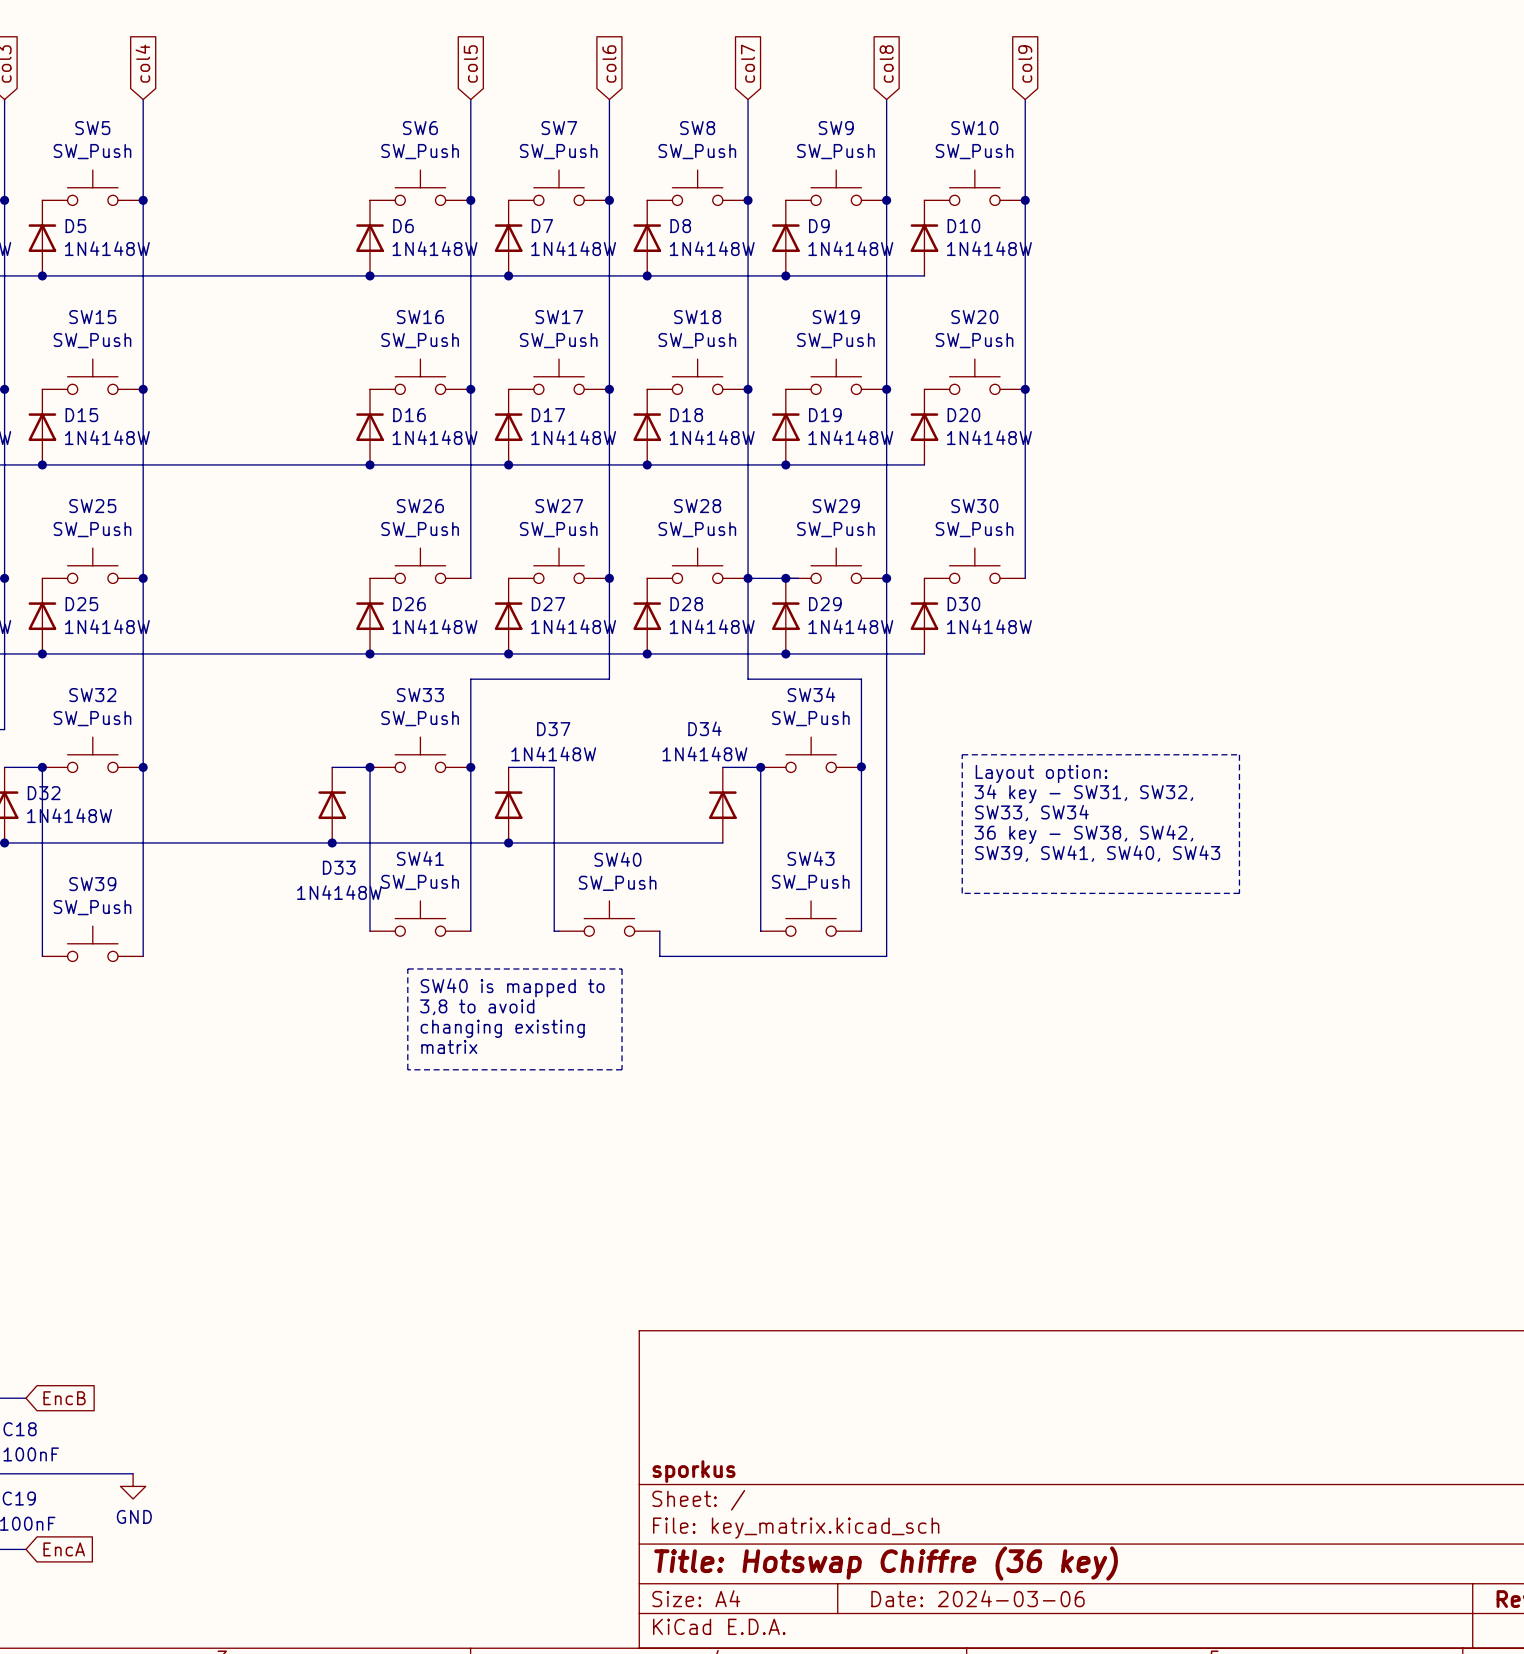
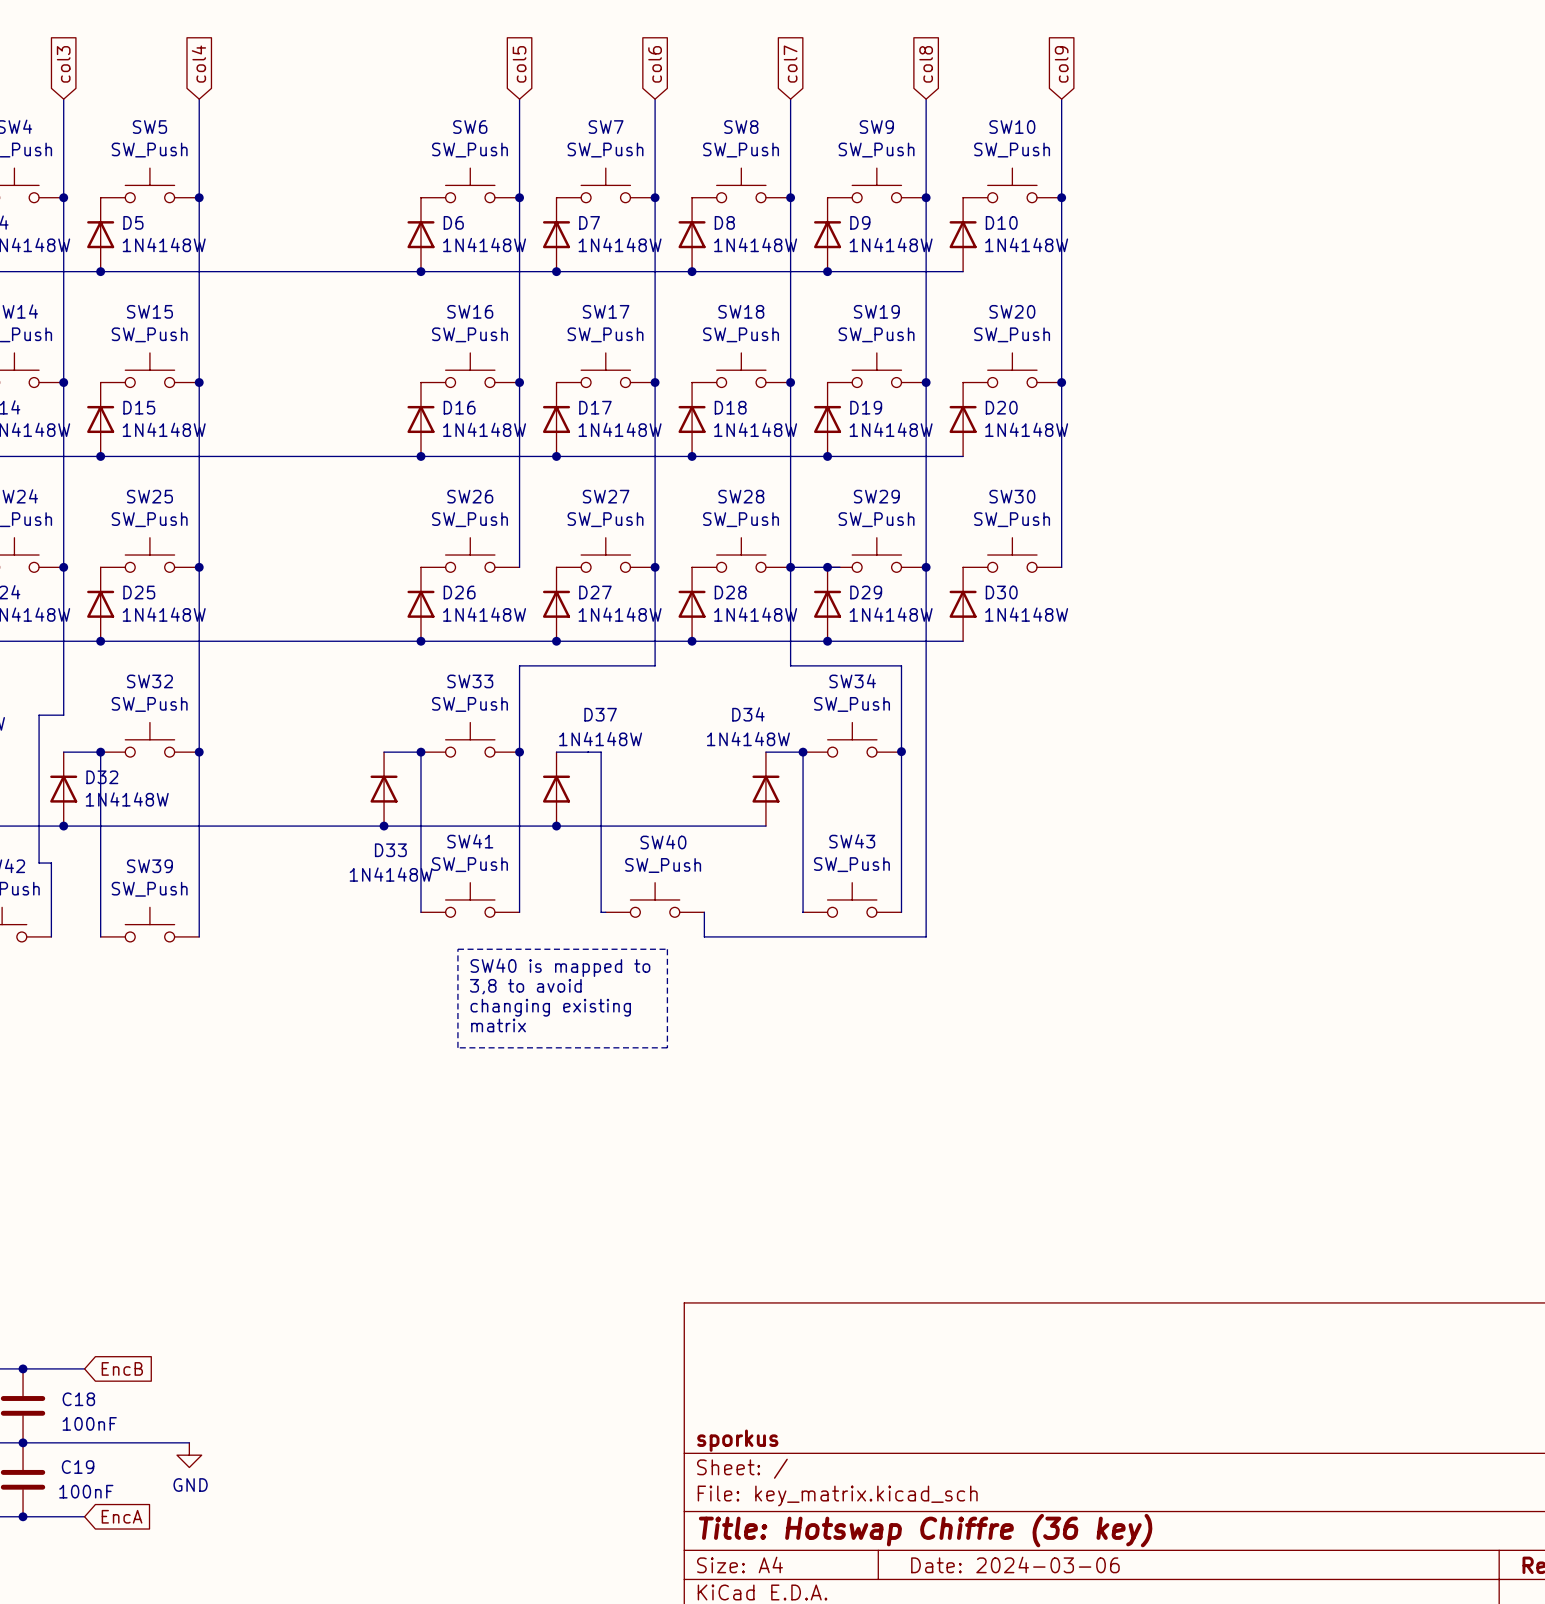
line: (962, 754) (1239, 754) (1239, 893) (962, 893) (962, 754) -> none
text: Layout option: (1041, 773) -> none
text: 34 key - SW31, SW32, (1083, 793) -> none
text: SW33, SW34 (1031, 813) -> none
text: 36 key - SW38, SW42, (1083, 834) -> none
text: SW39, SW41, SW40, SW43 (1097, 853) -> none

